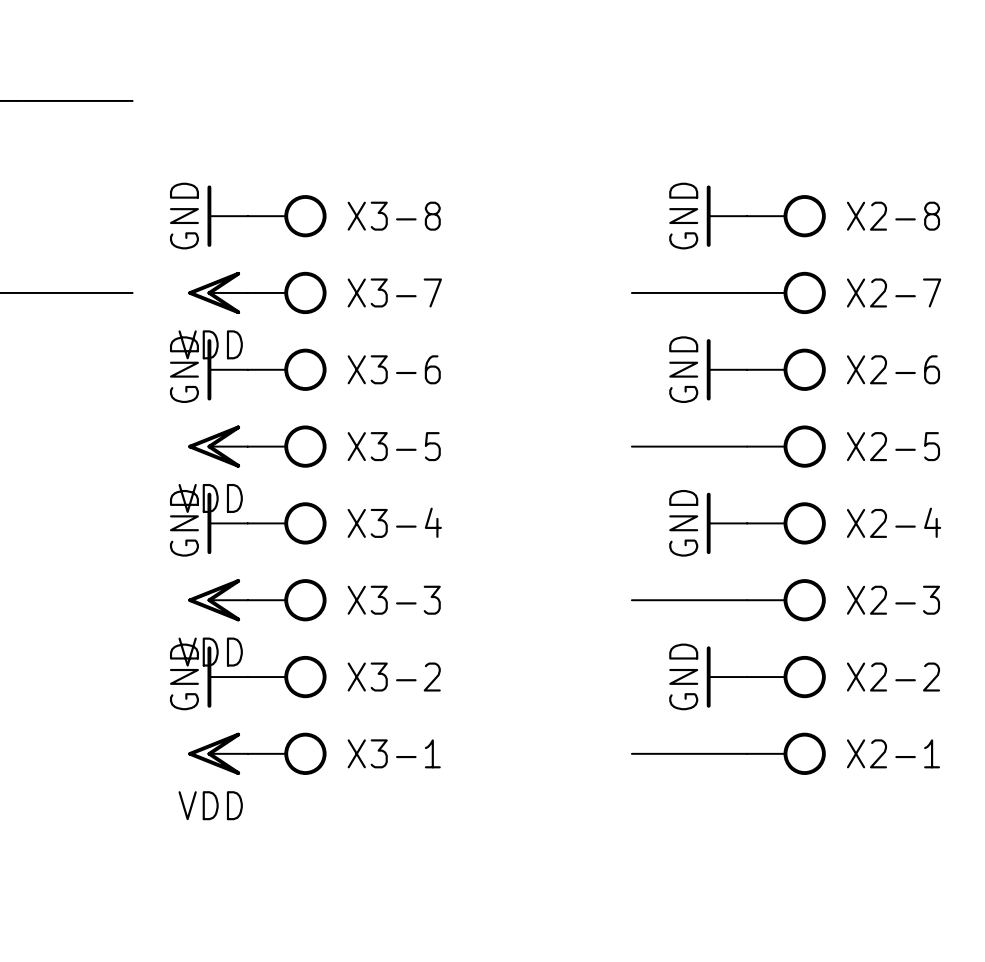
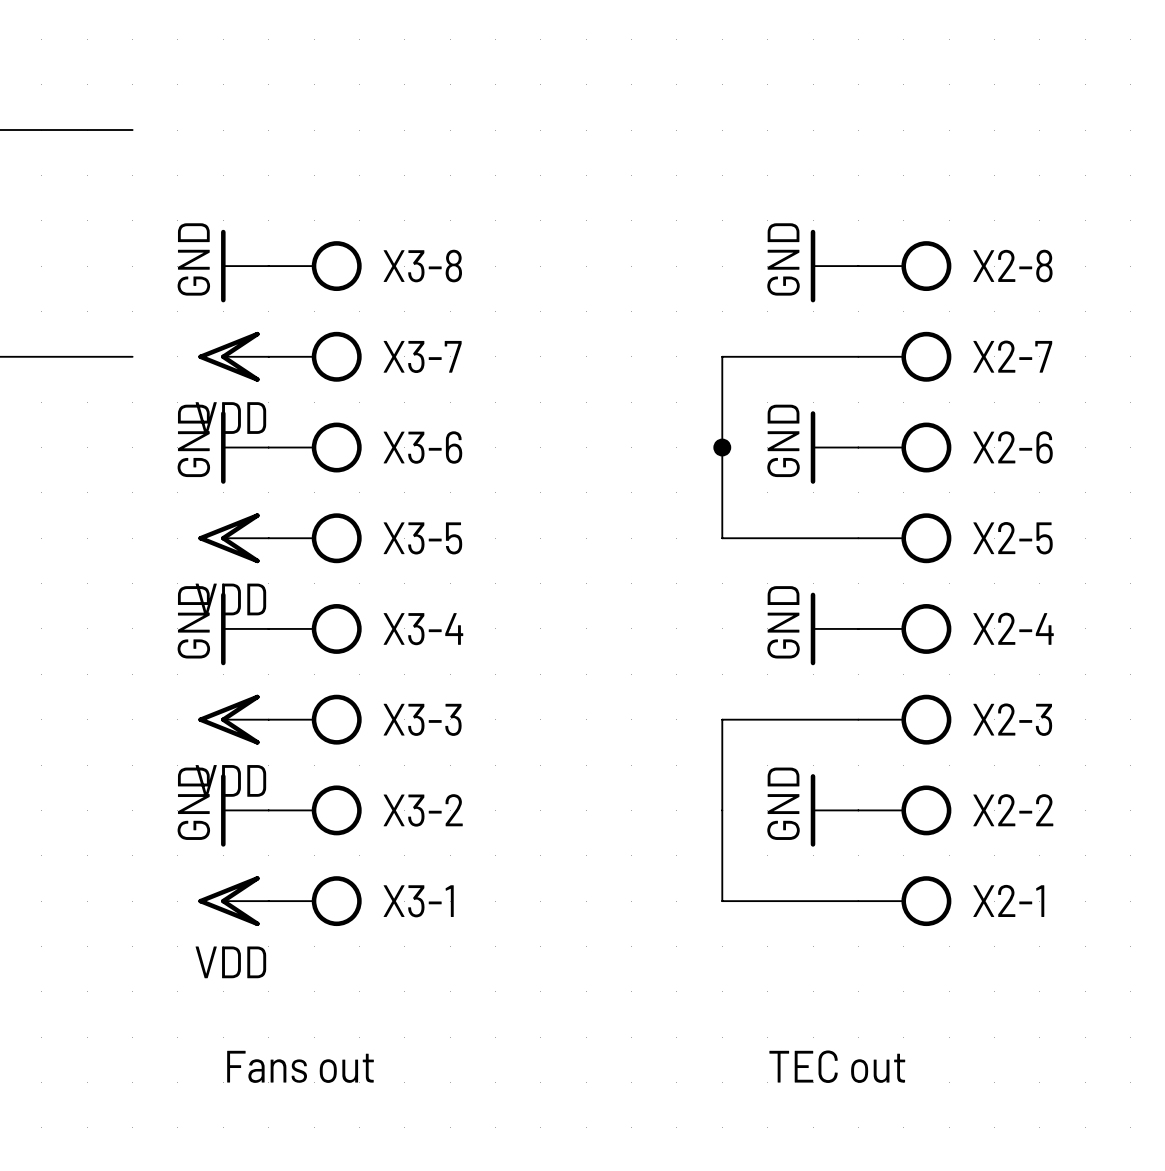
wire: none -> (722, 356) (722, 538)
junction: none -> (722, 447)
wire: none -> (722, 719) (722, 901)
text: none -> Fans out (300, 1066)
text: none -> TEC out (837, 1066)

